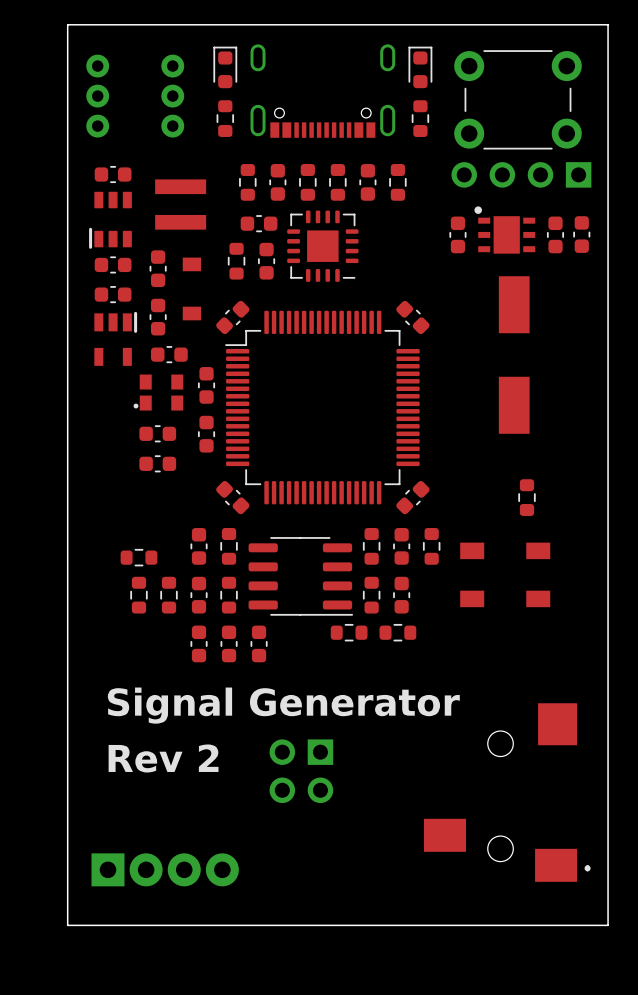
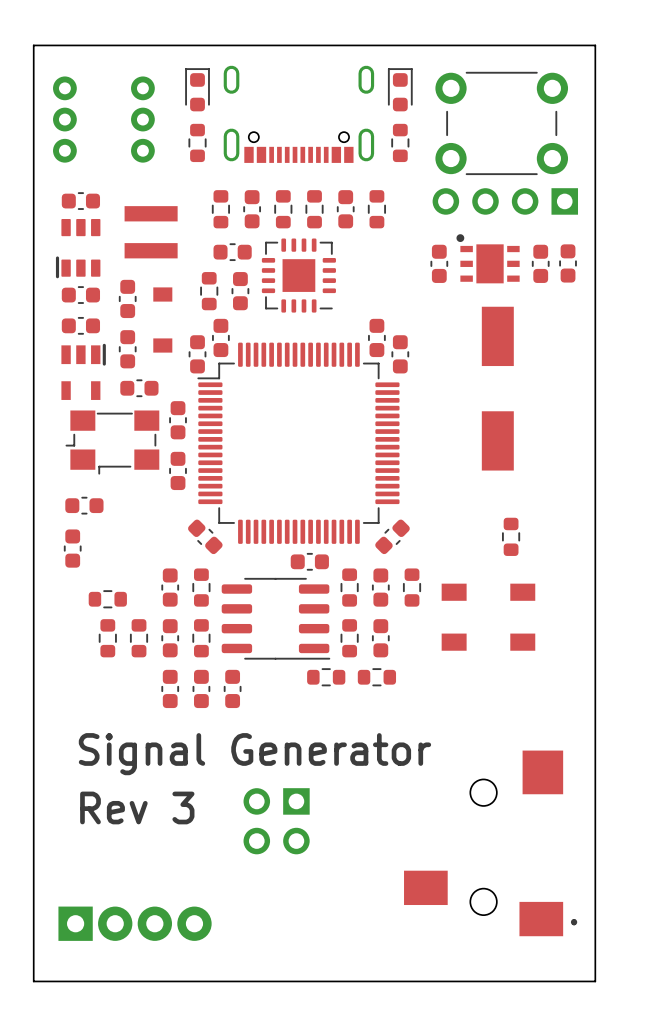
part: none -> (220, 337)
part: none -> (376, 337)
part rotation: 0° (232, 317) -> 45° counterclockwise (197, 354)
part rotation: 0° (412, 317) -> 45° clockwise (400, 354)
part: (158, 392) -> none
part: none -> (112, 442)
part: (157, 433) -> none
part: (157, 463) -> none
part: none -> (84, 505)
part: none -> (72, 548)
part: none -> (309, 561)
text: Rev 2 (163, 758) -> Rev 3 (137, 807)

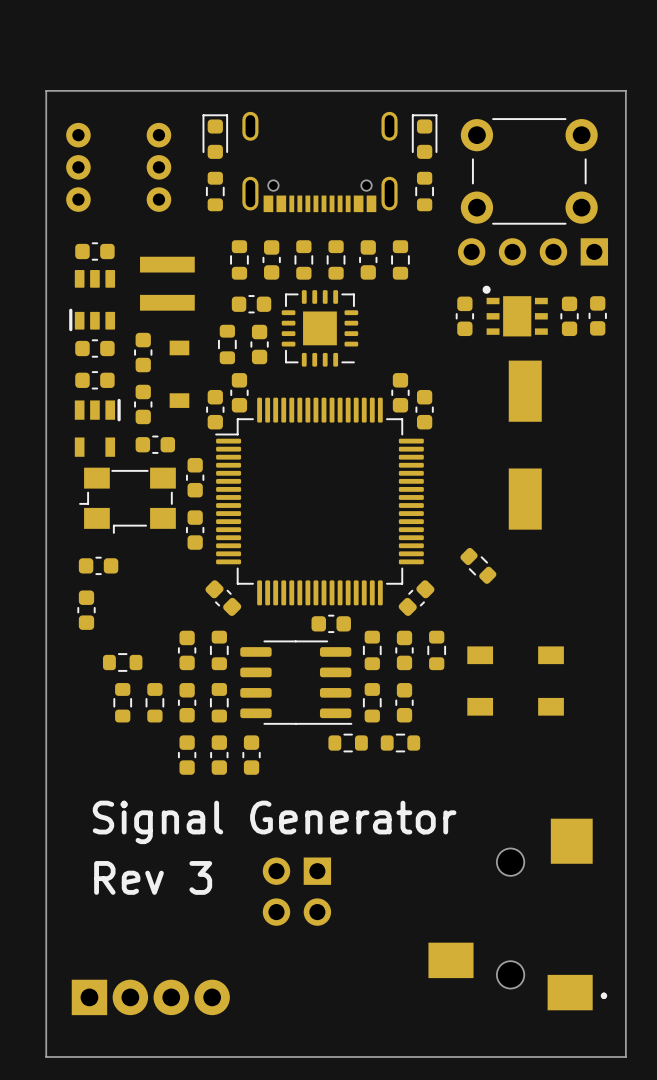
part: none -> (478, 565)
part: (511, 536) -> none

